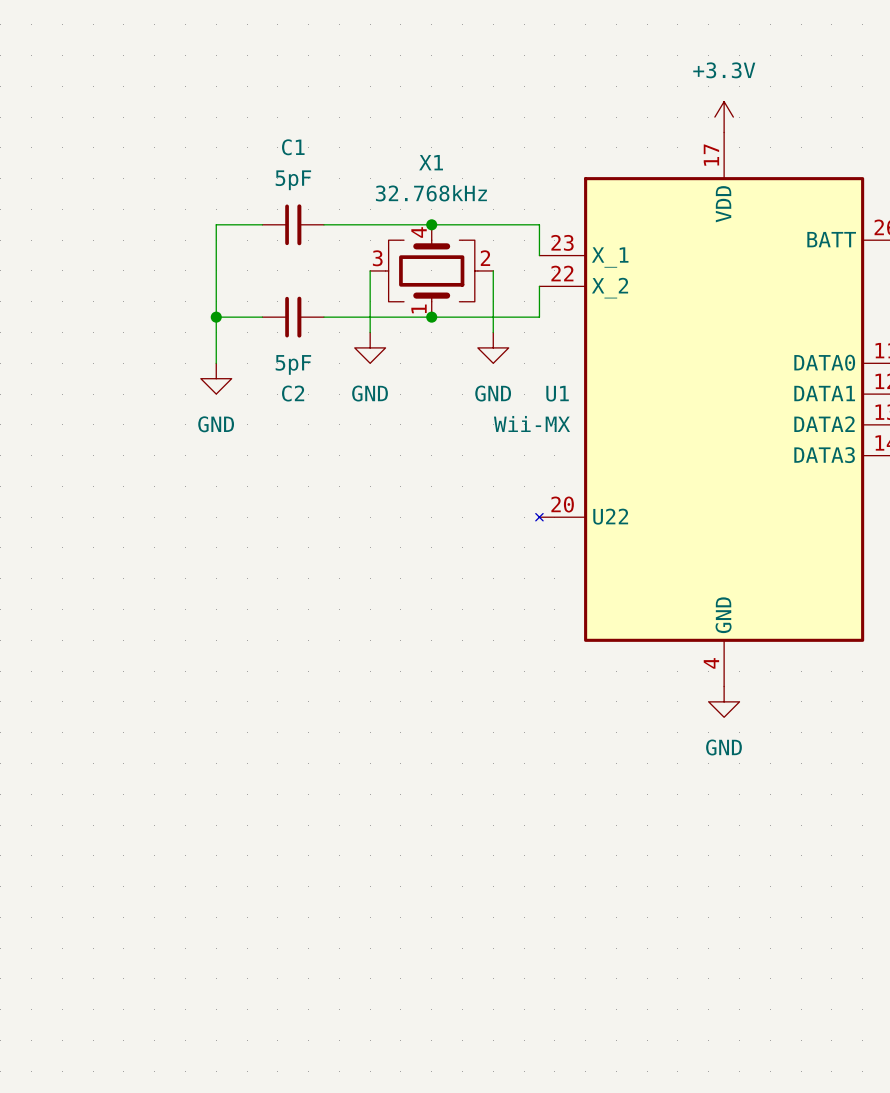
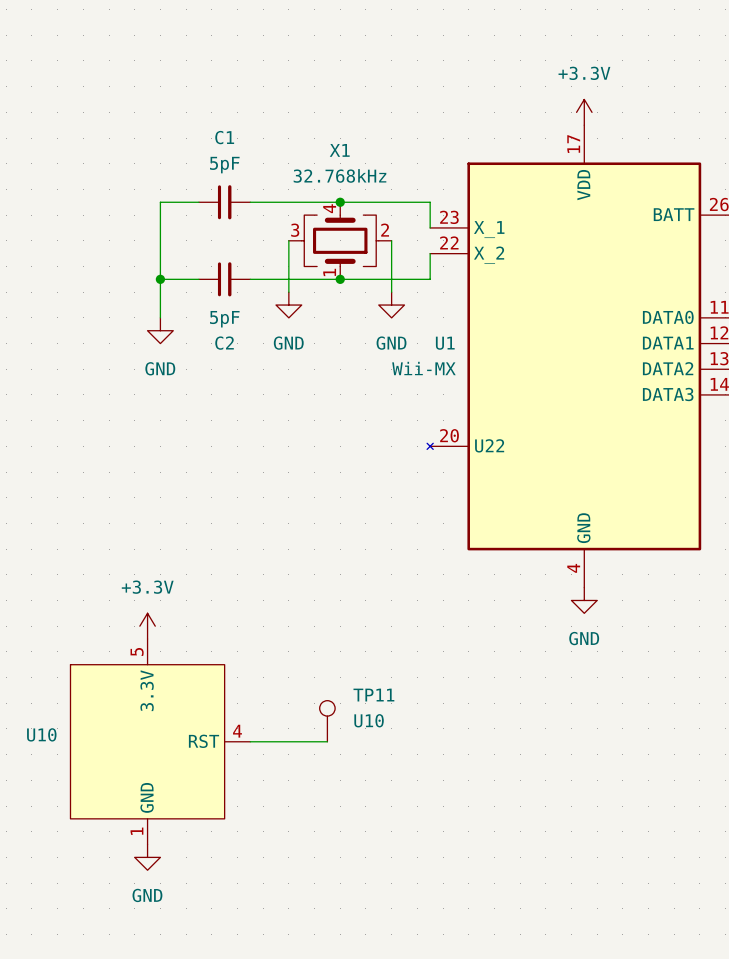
power symbol: none -> +3.3V (147, 626)
TP11: none -> U10 (327, 721)
U10: none -> (160, 741)
wire: none -> (250, 741) (327, 741)
power symbol: none -> GND (147, 857)

